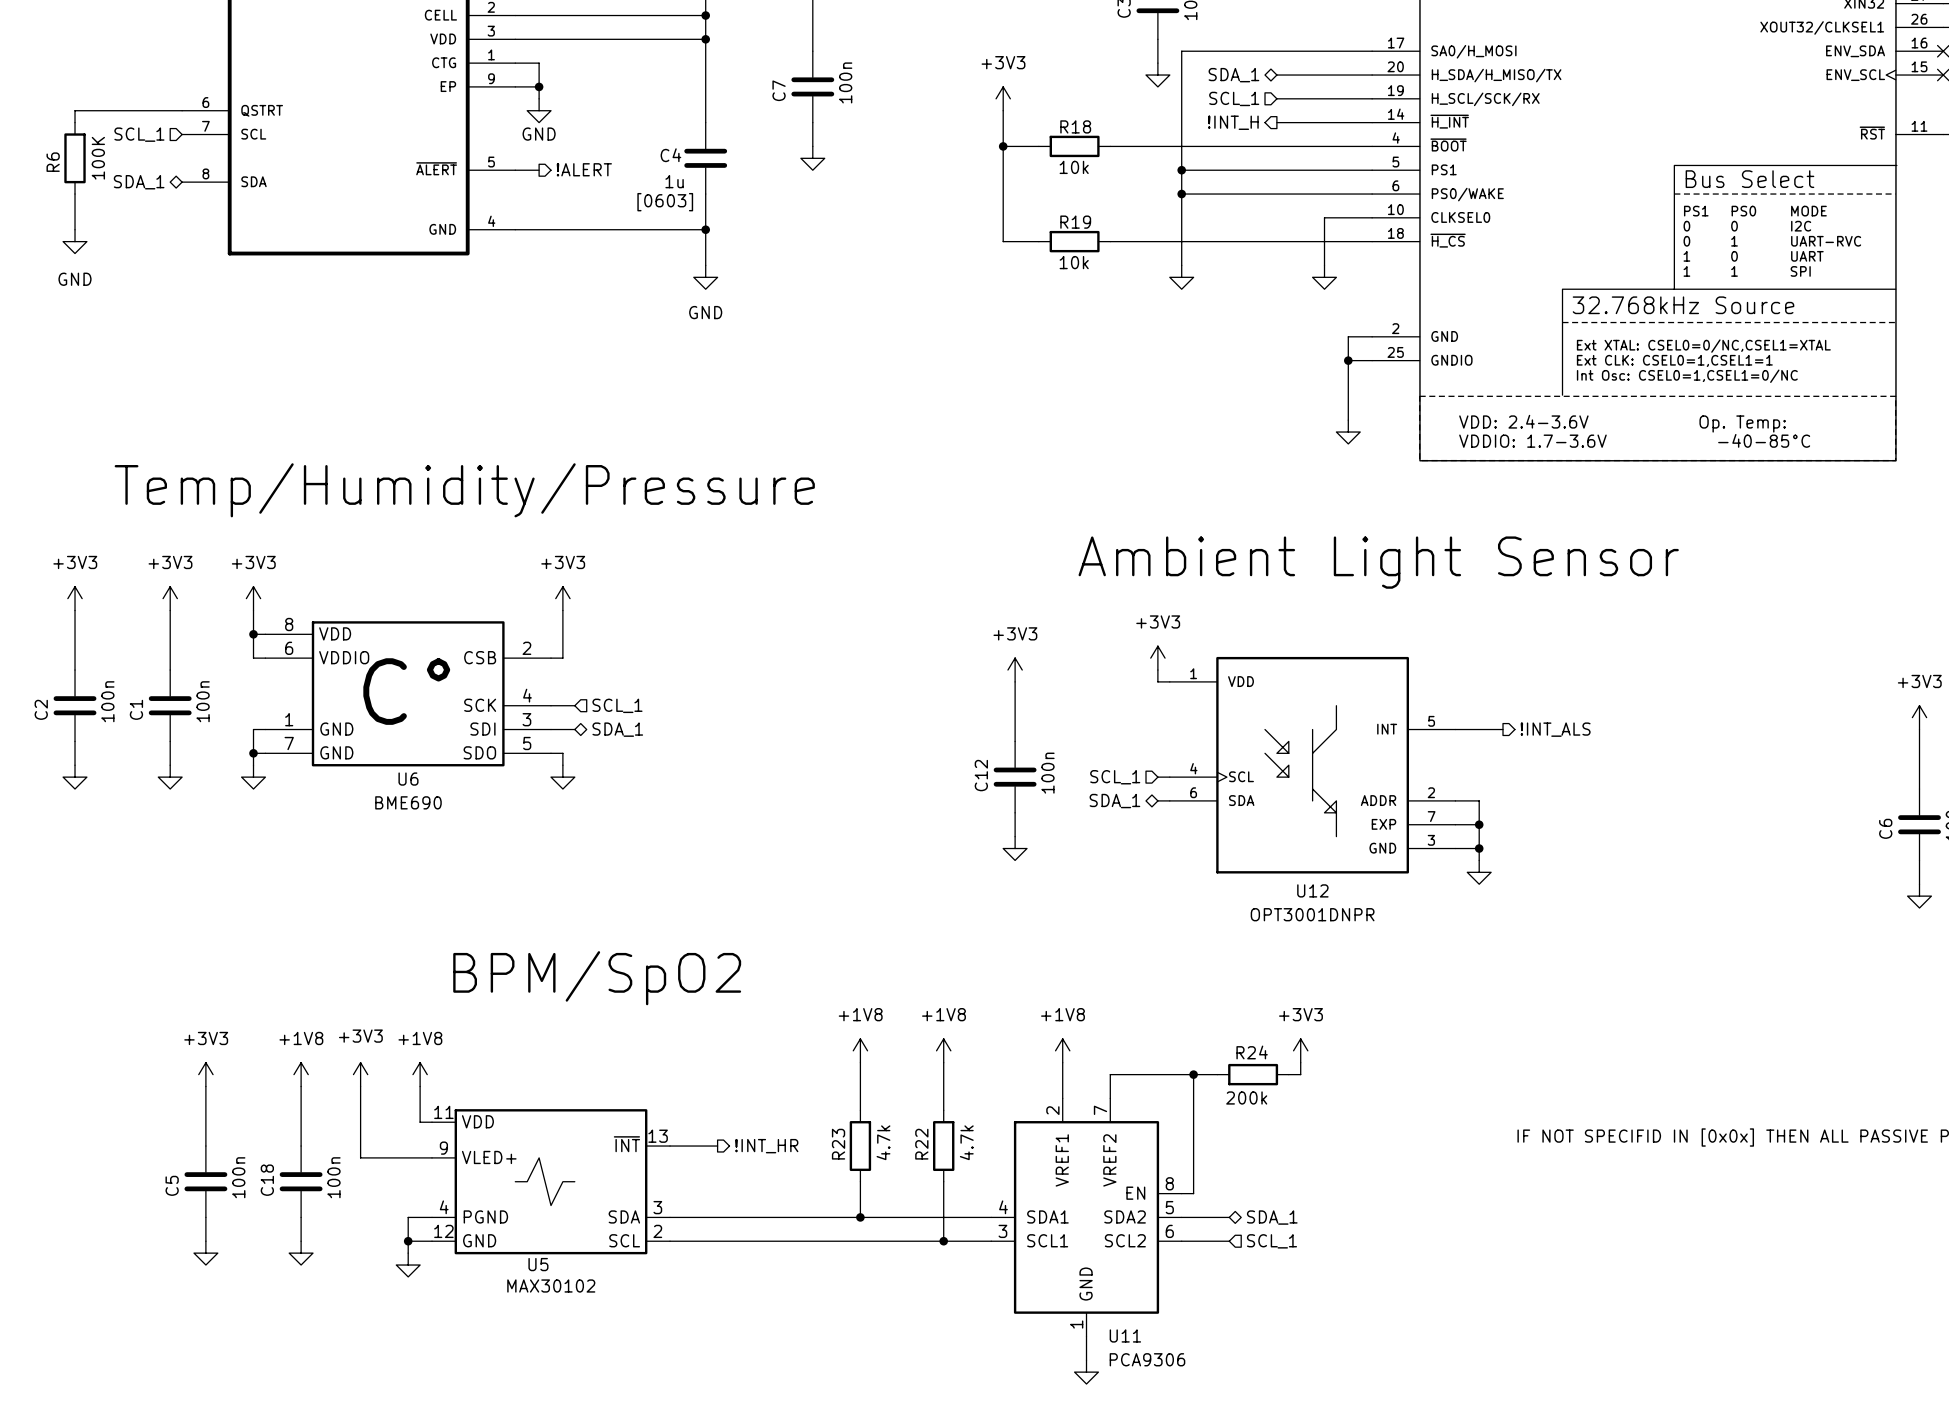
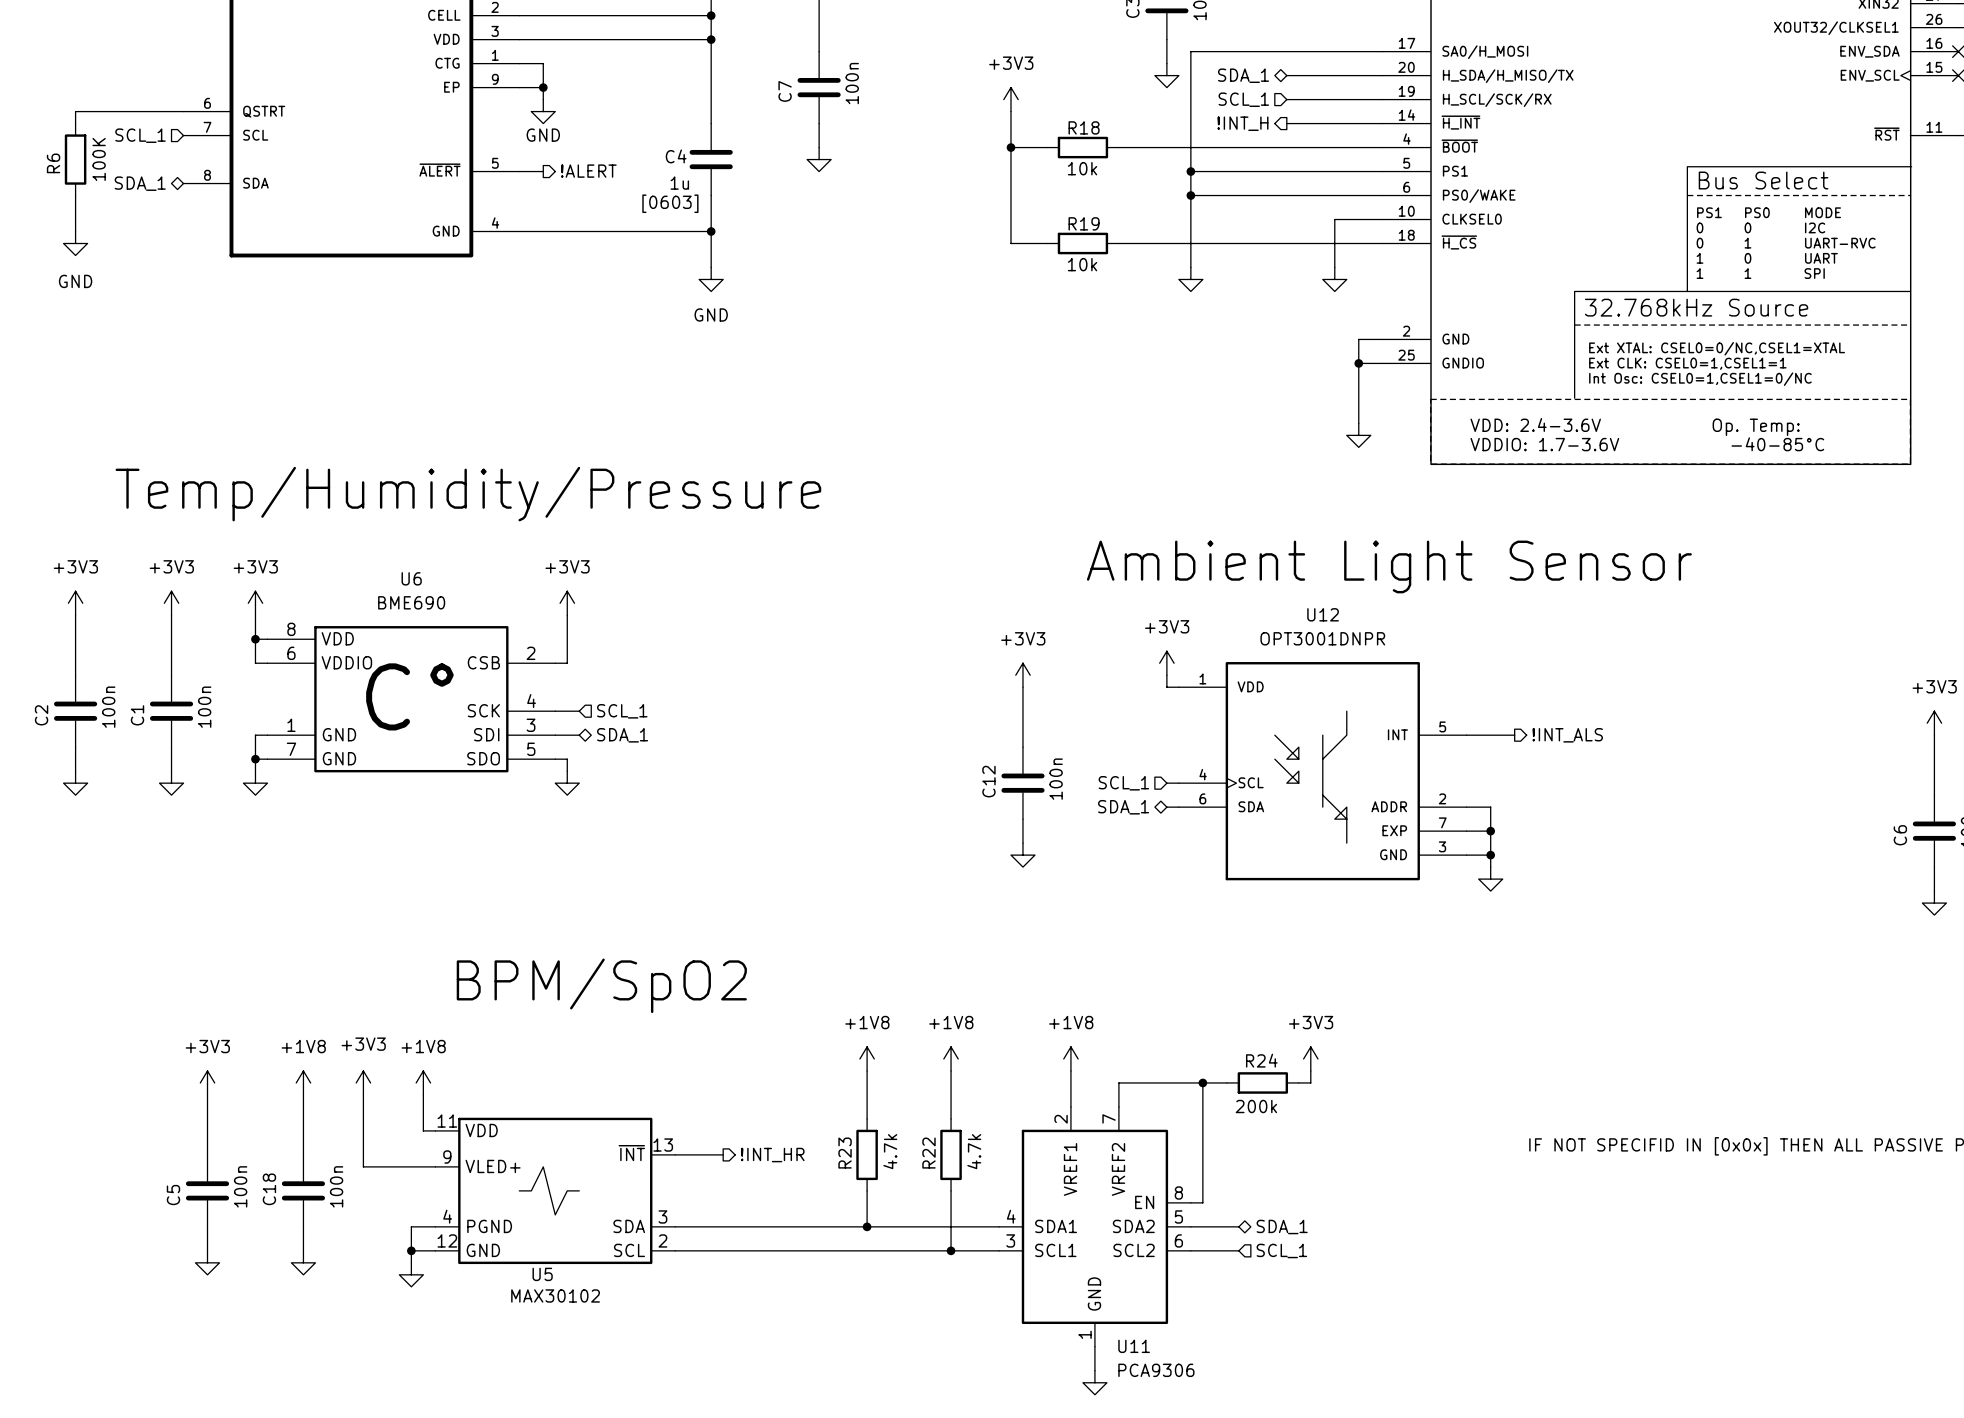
U6 name position: U6 (408, 779) -> U6 (411, 578)
U6 value position: BME690 (408, 802) -> BME690 (411, 602)
U12 name position: U12 (1312, 890) -> U12 (1323, 614)
U12 value position: OPT3001DNPR (1312, 914) -> OPT3001DNPR (1322, 638)

